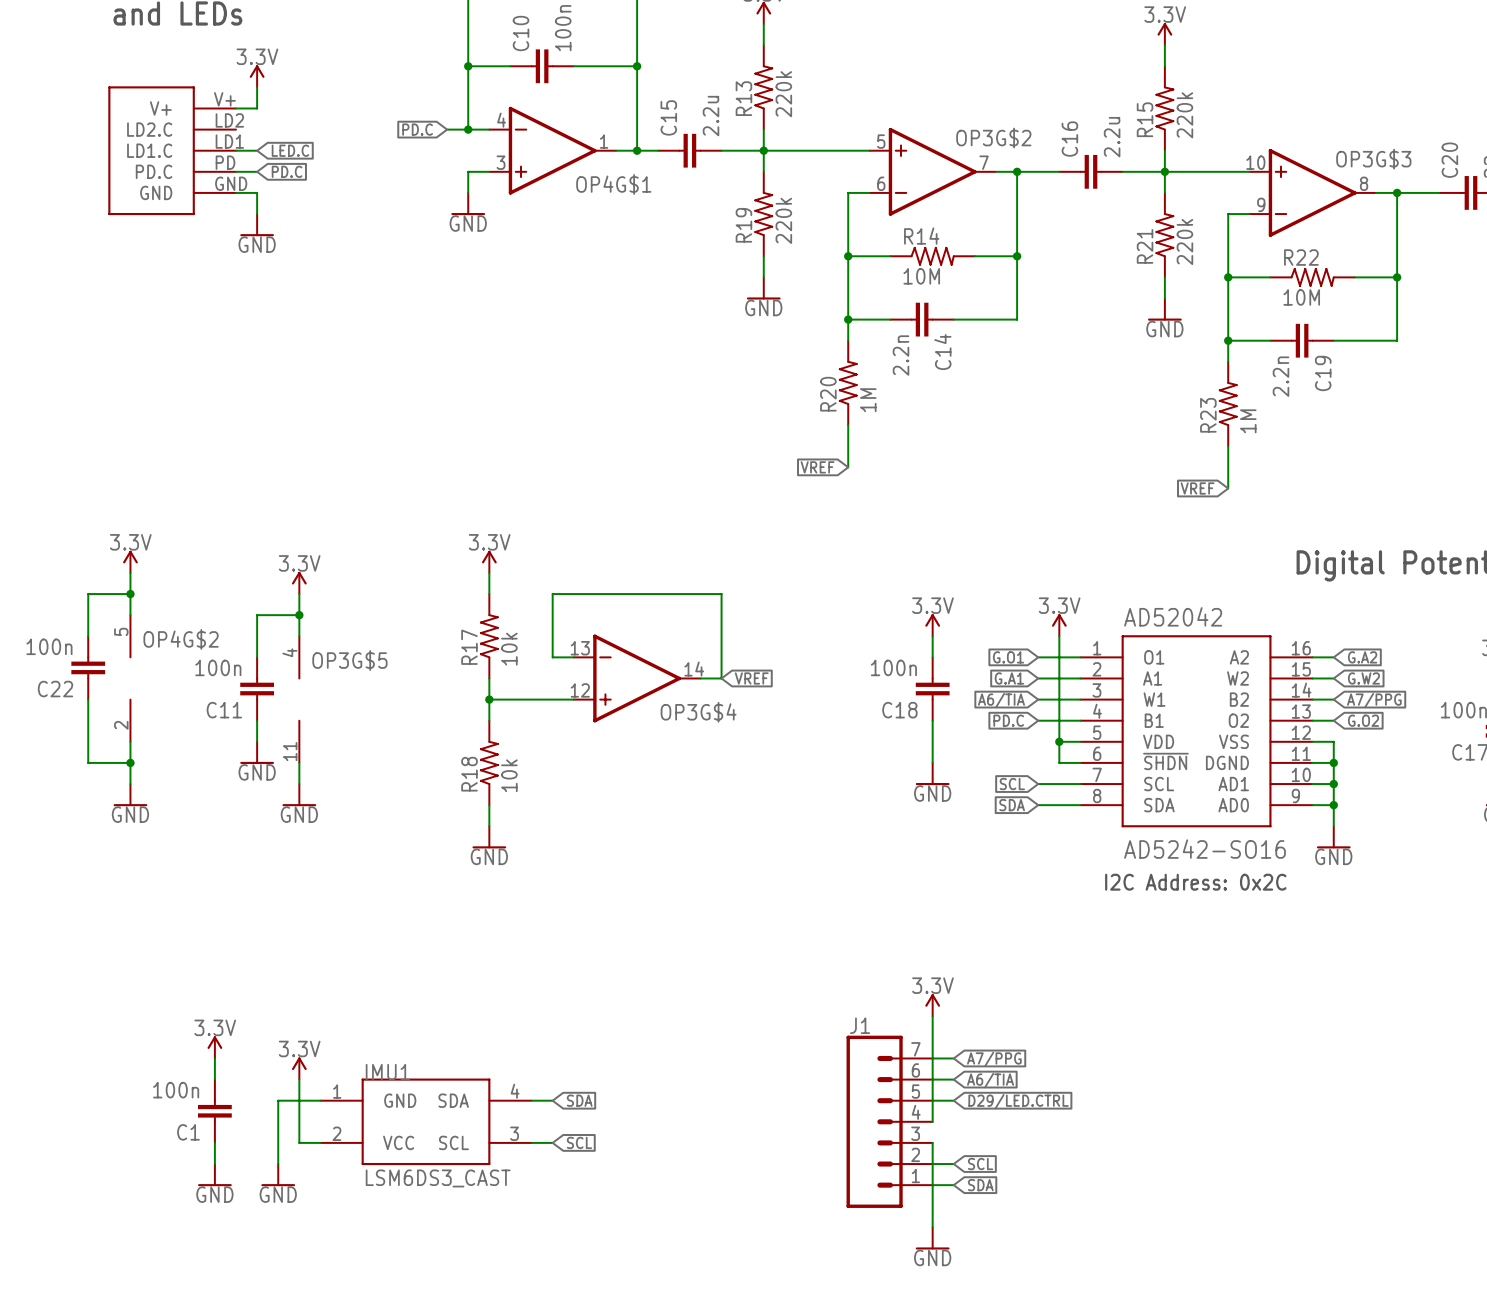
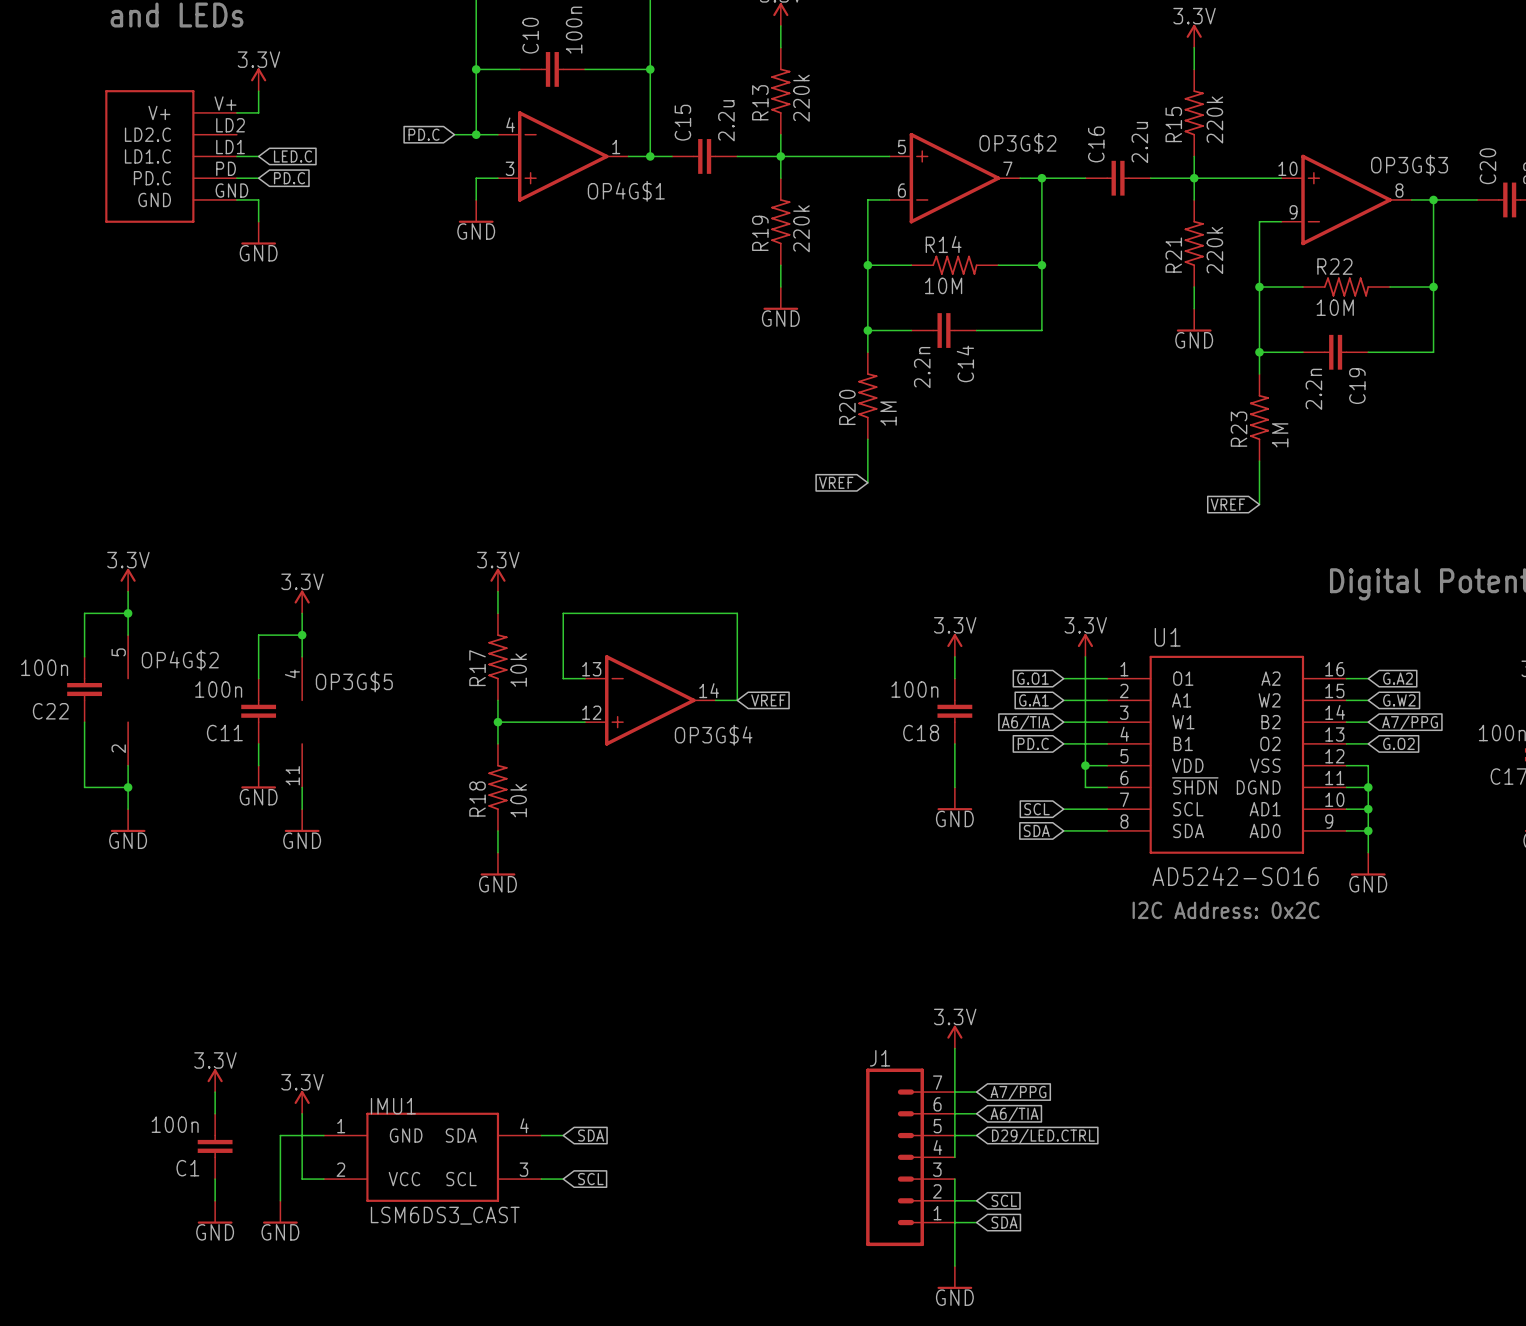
AD52042 name: AD52042 (1173, 616) -> U1 (1167, 637)

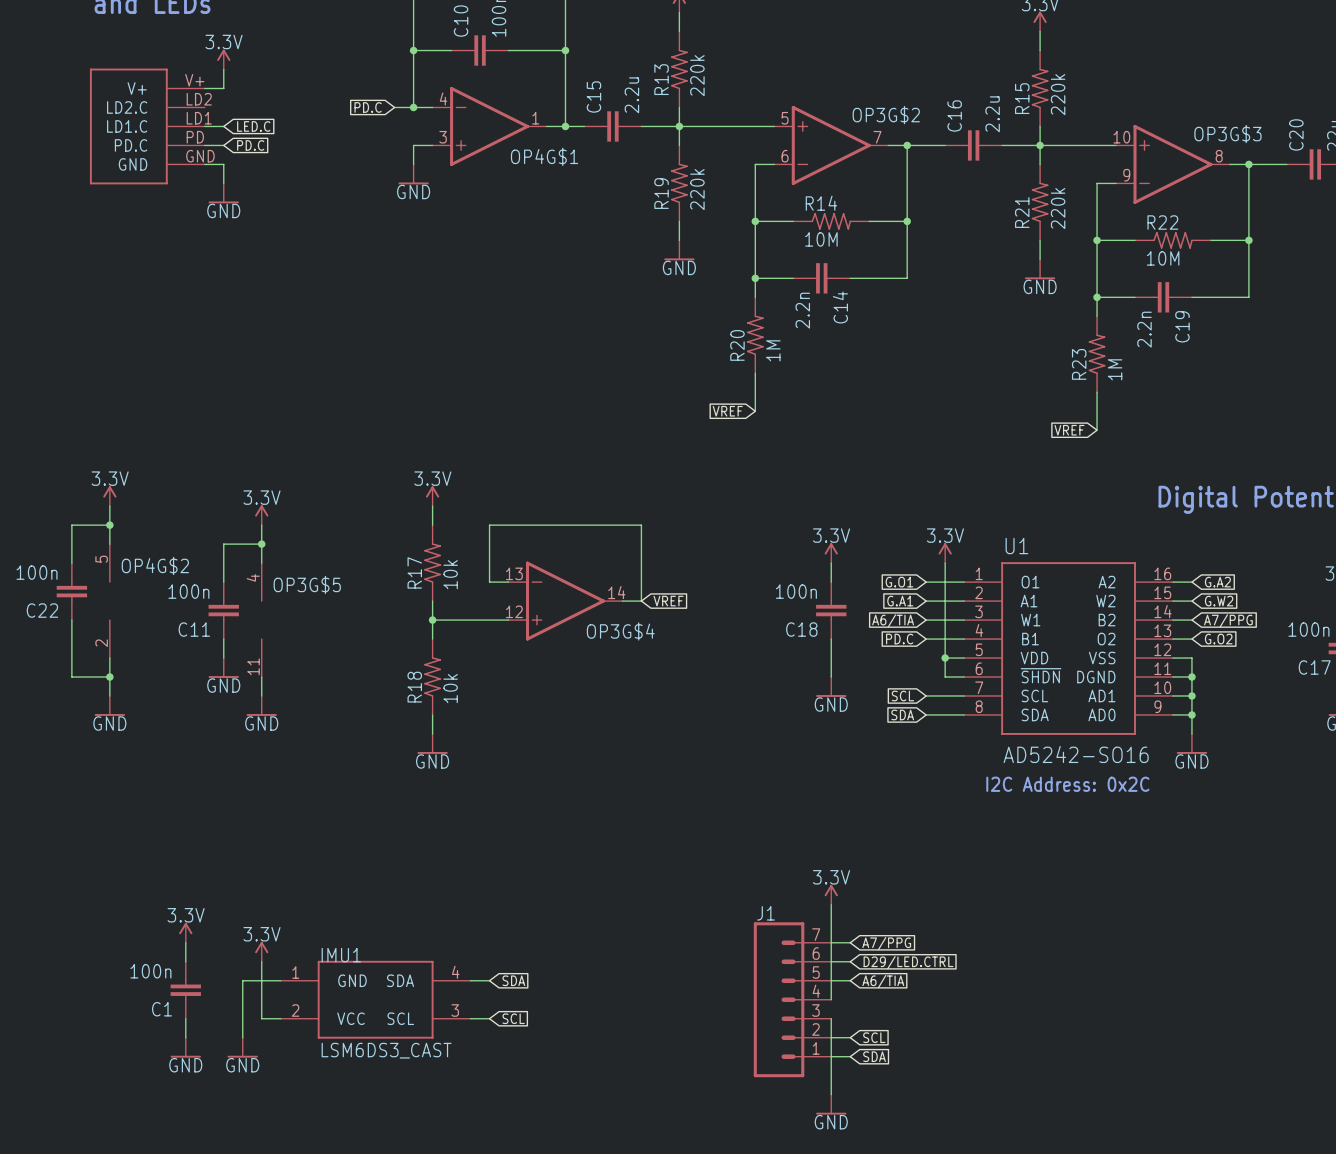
global label: A6/TIA (1014, 1114) -> D29/LED.CTRL (908, 962)
global label: D29/LED.CTRL (1043, 1136) -> A6/TIA (883, 981)

